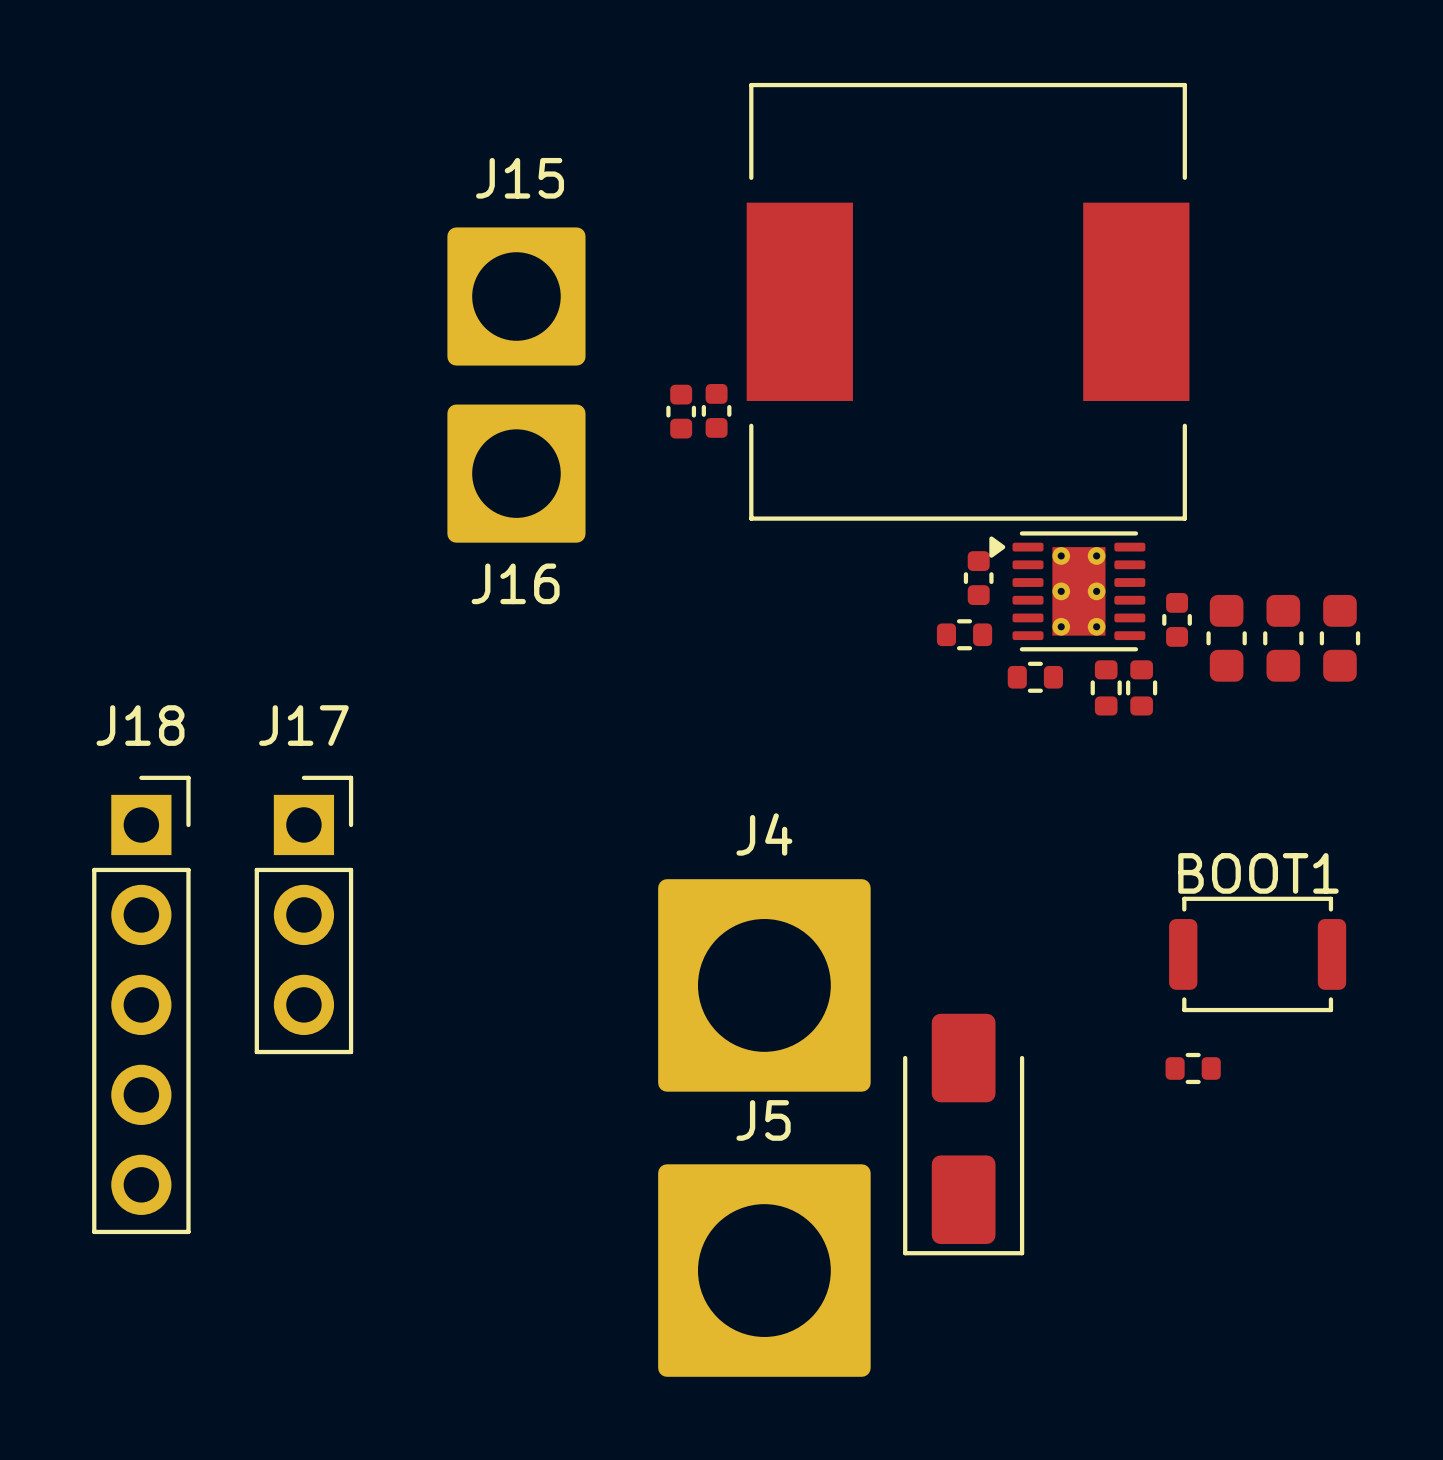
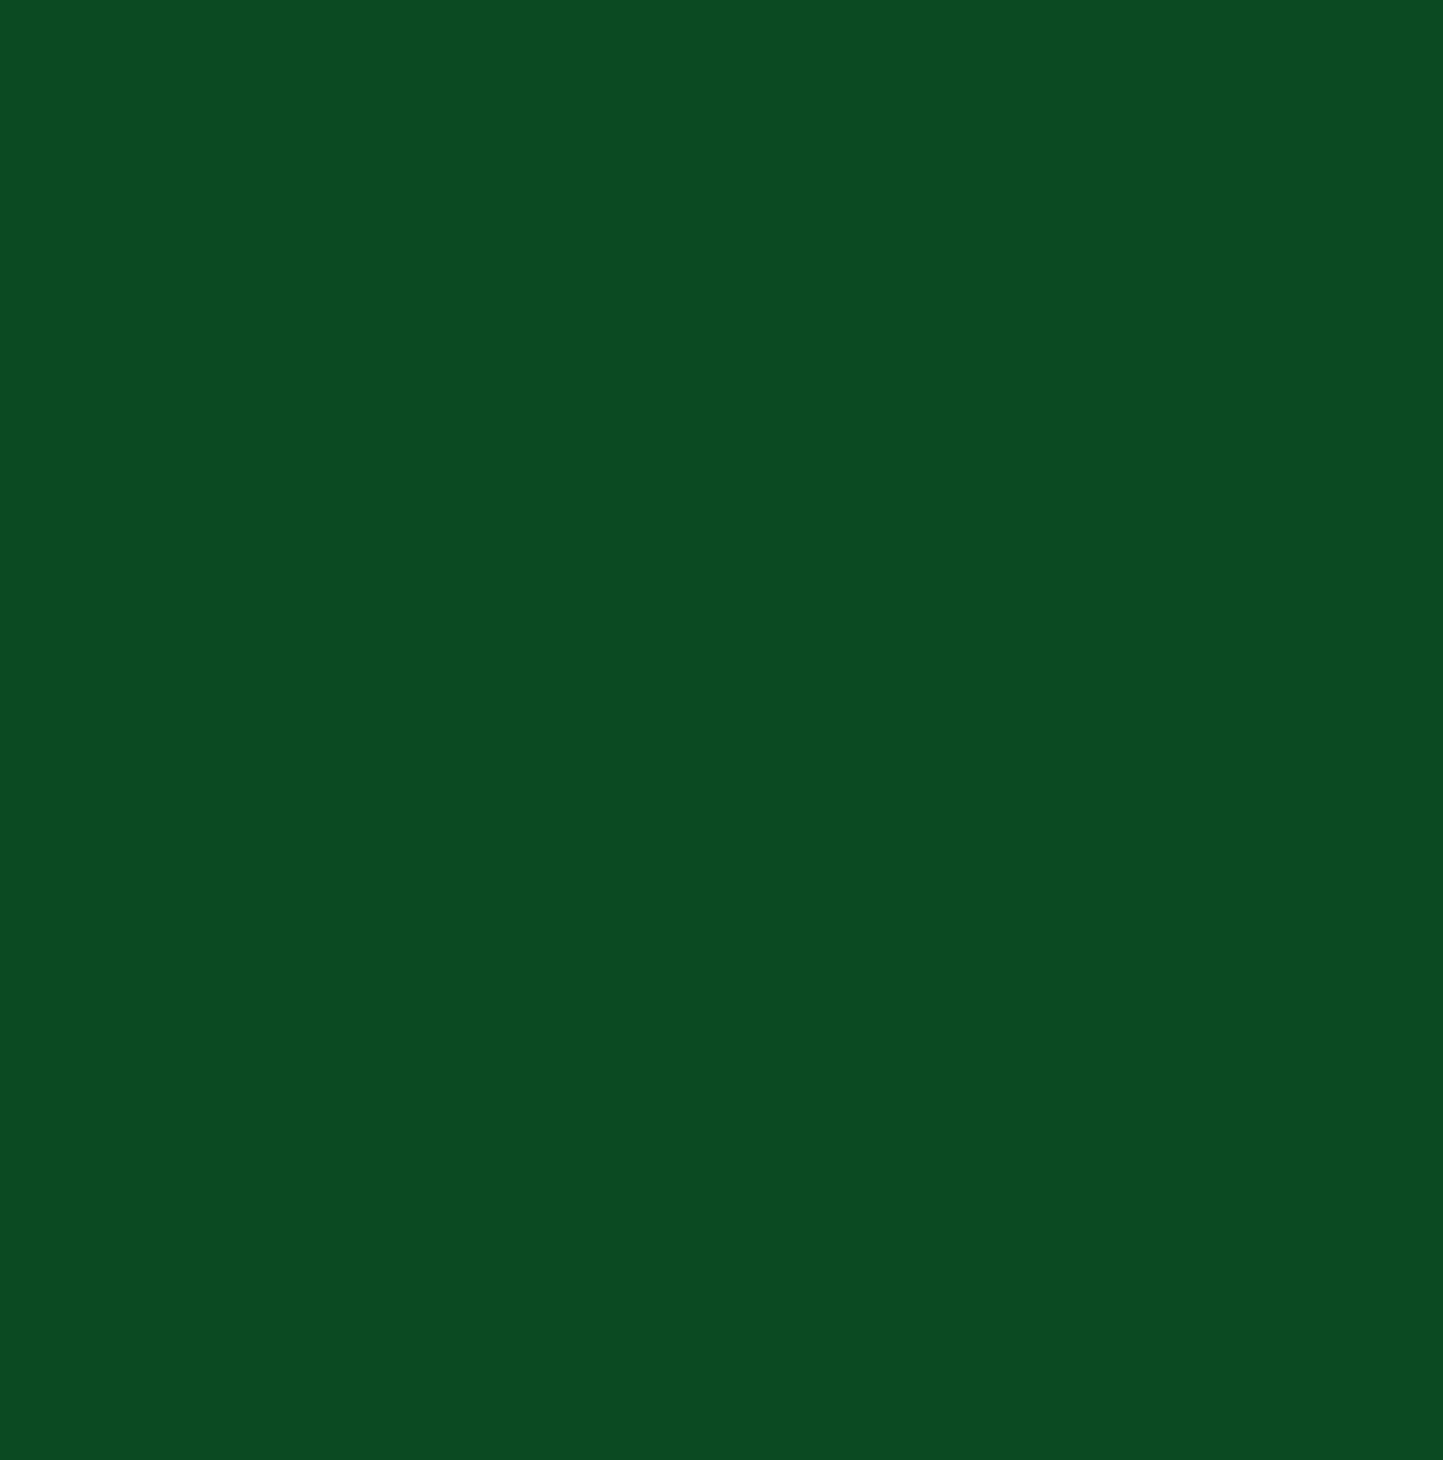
J15: (516, 296) -> none
part: (968, 301) -> none
part: (716, 410) -> none
part: (681, 411) -> none
J16: (516, 473) -> none
part: (978, 578) -> none
part: (1067, 591) -> none
part: (1177, 619) -> none
part: (964, 634) -> none
part: (1226, 638) -> none
part: (1283, 638) -> none
part: (1339, 638) -> none
part: (1035, 677) -> none
part: (1106, 687) -> none
part: (1141, 687) -> none
J17: (303, 914) -> none
BOOT1: (1257, 954) -> none
J4: (764, 985) -> none
J18: (141, 1004) -> none
part: (1193, 1068) -> none
part: (963, 1134) -> none
J5: (764, 1270) -> none

